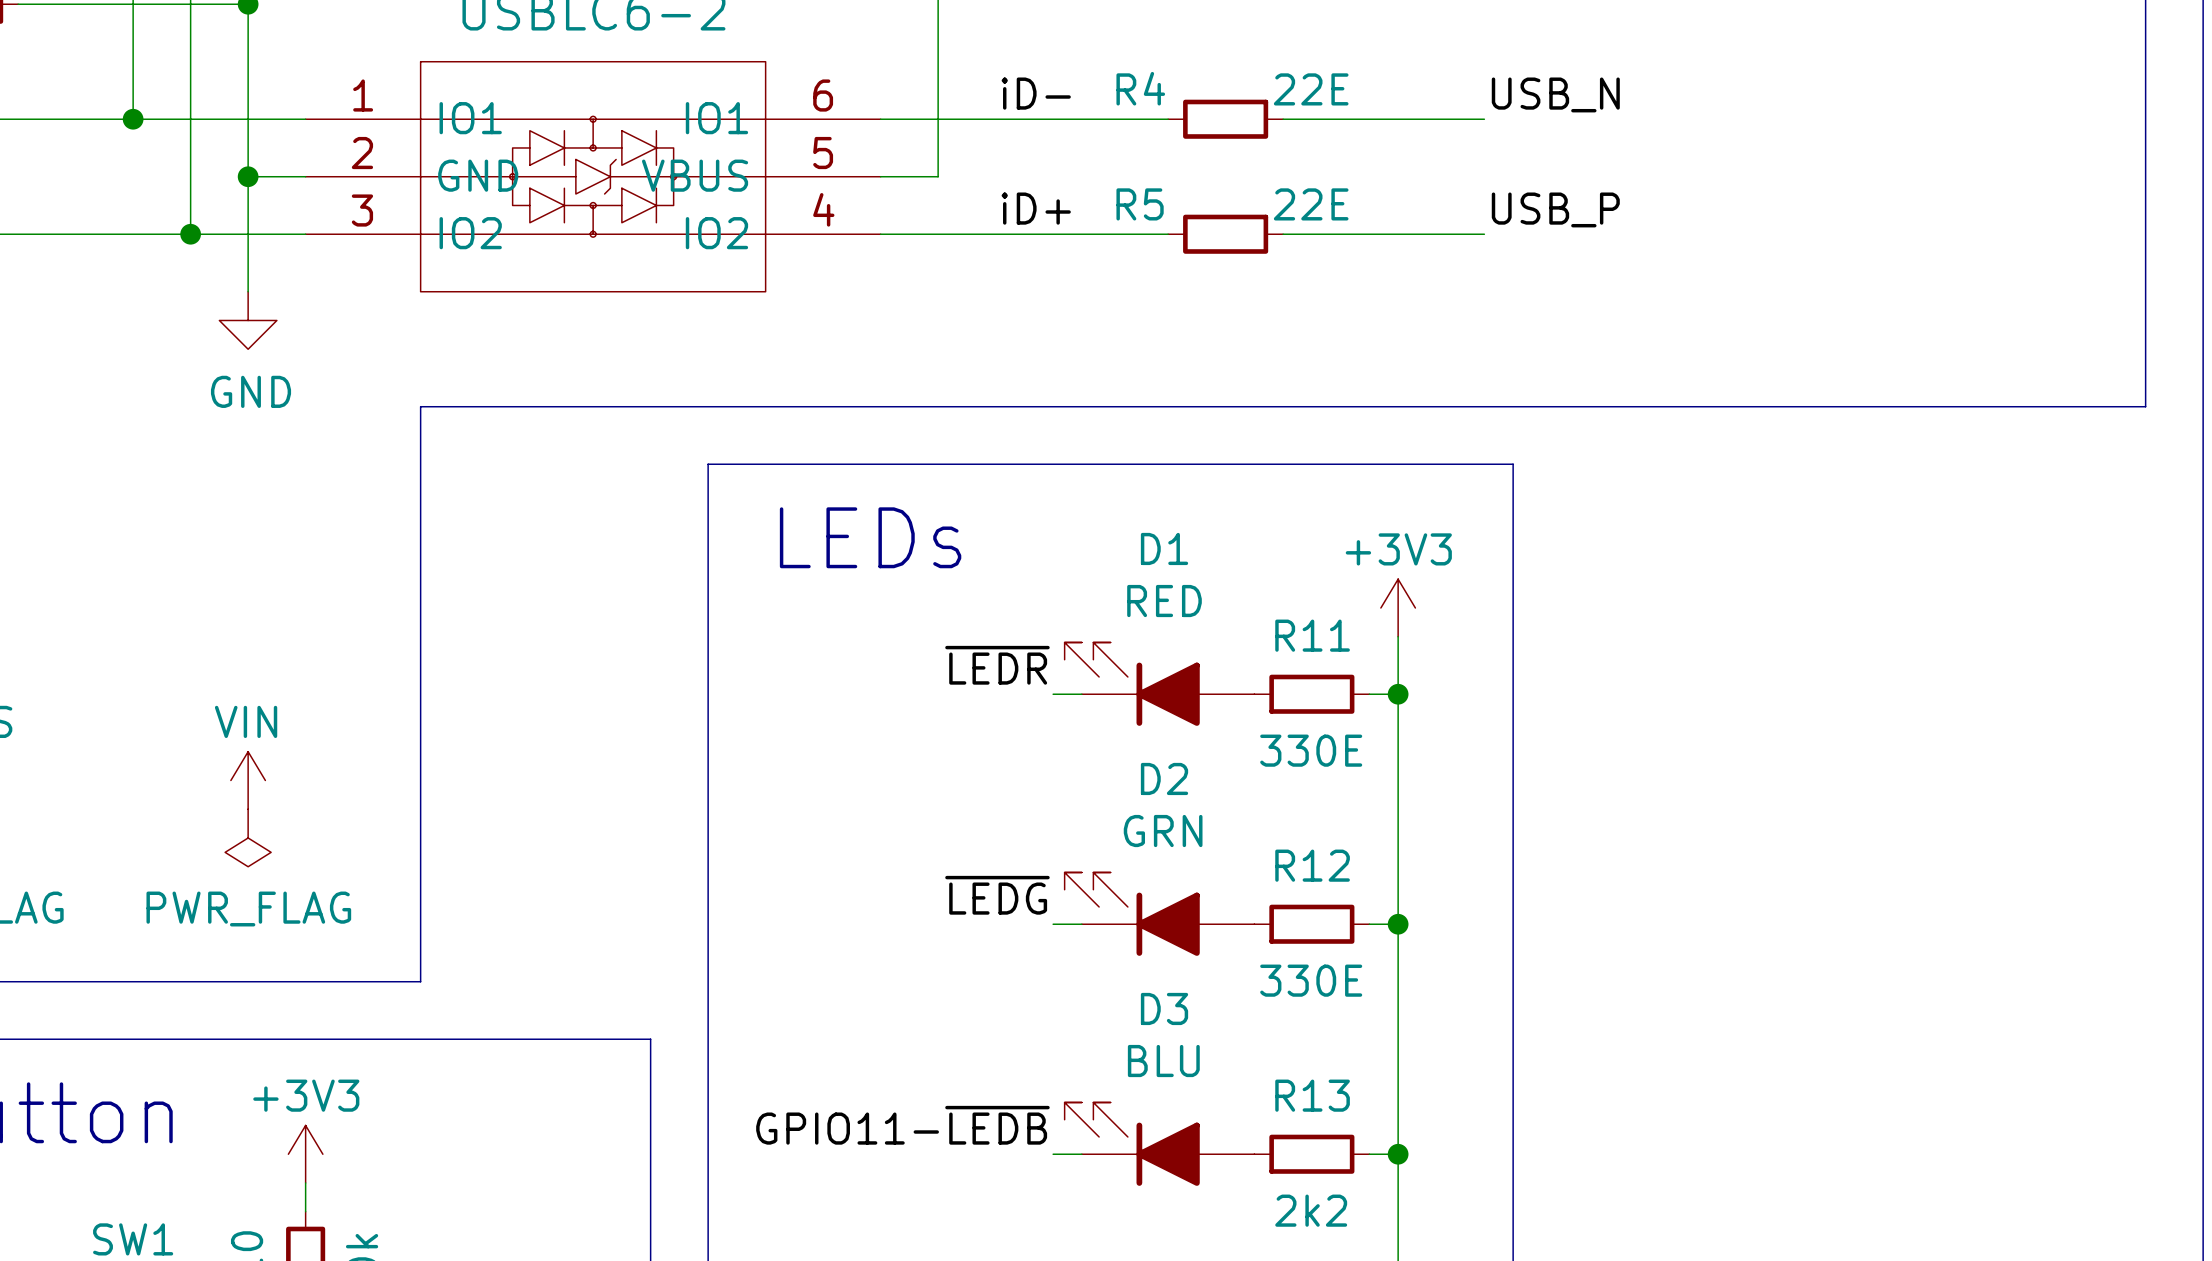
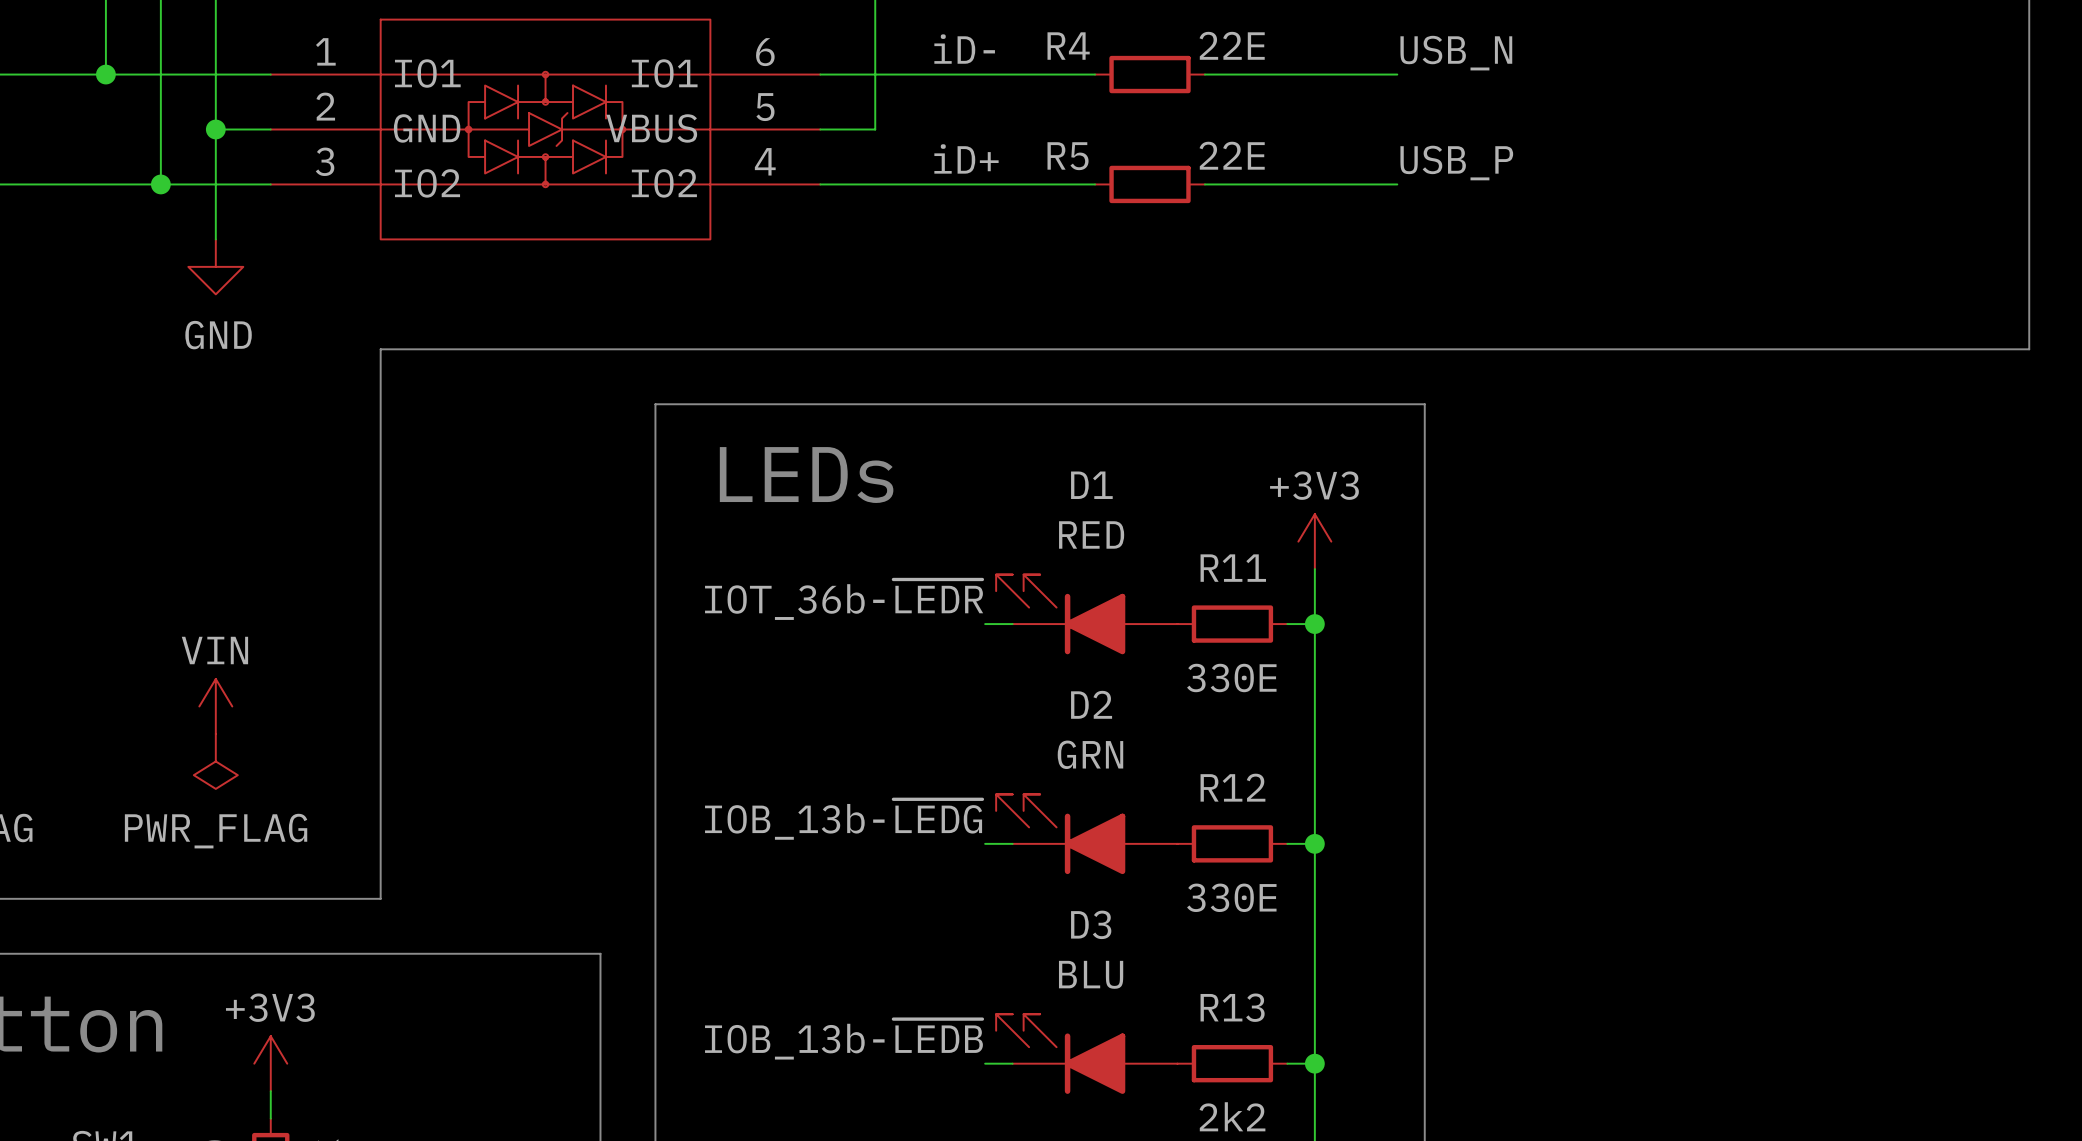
label: ~{LEDR} (997, 665) -> IOT_36b-~{LEDR} (844, 599)
label: ~{LEDG} (997, 895) -> IOB_13b-~{LEDG} (843, 819)
label: GPIO11-~{LEDB} (902, 1125) -> IOB_13b-~{LEDB} (843, 1039)

